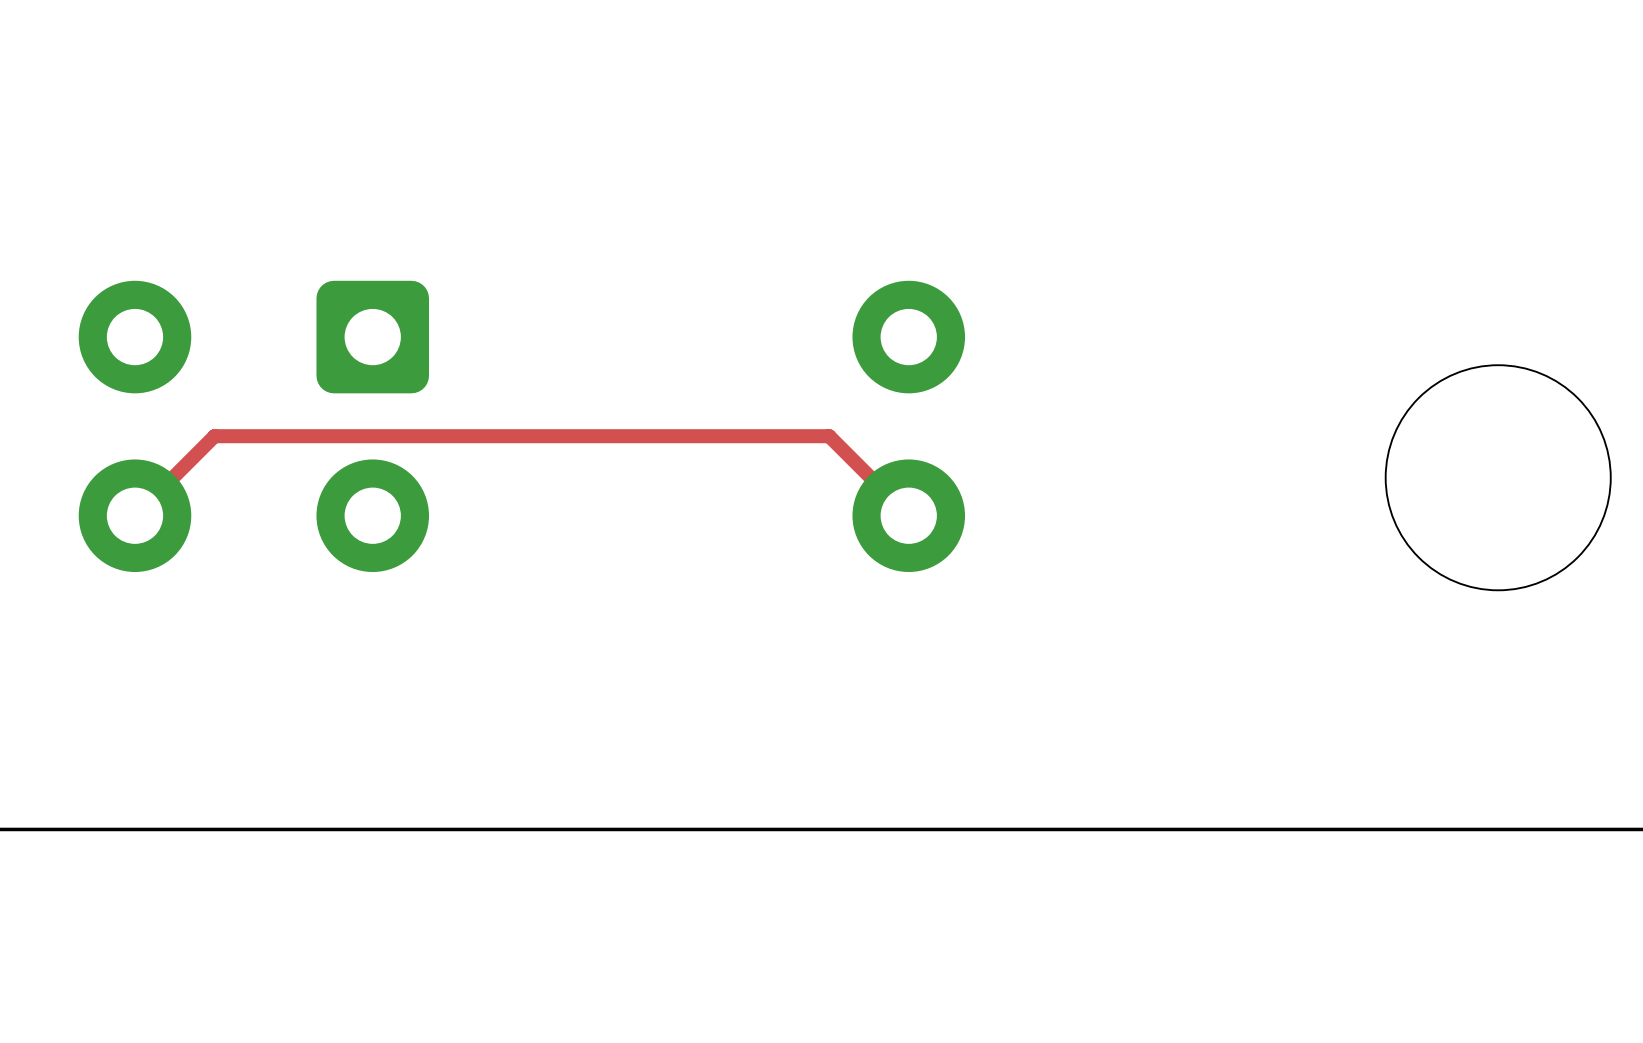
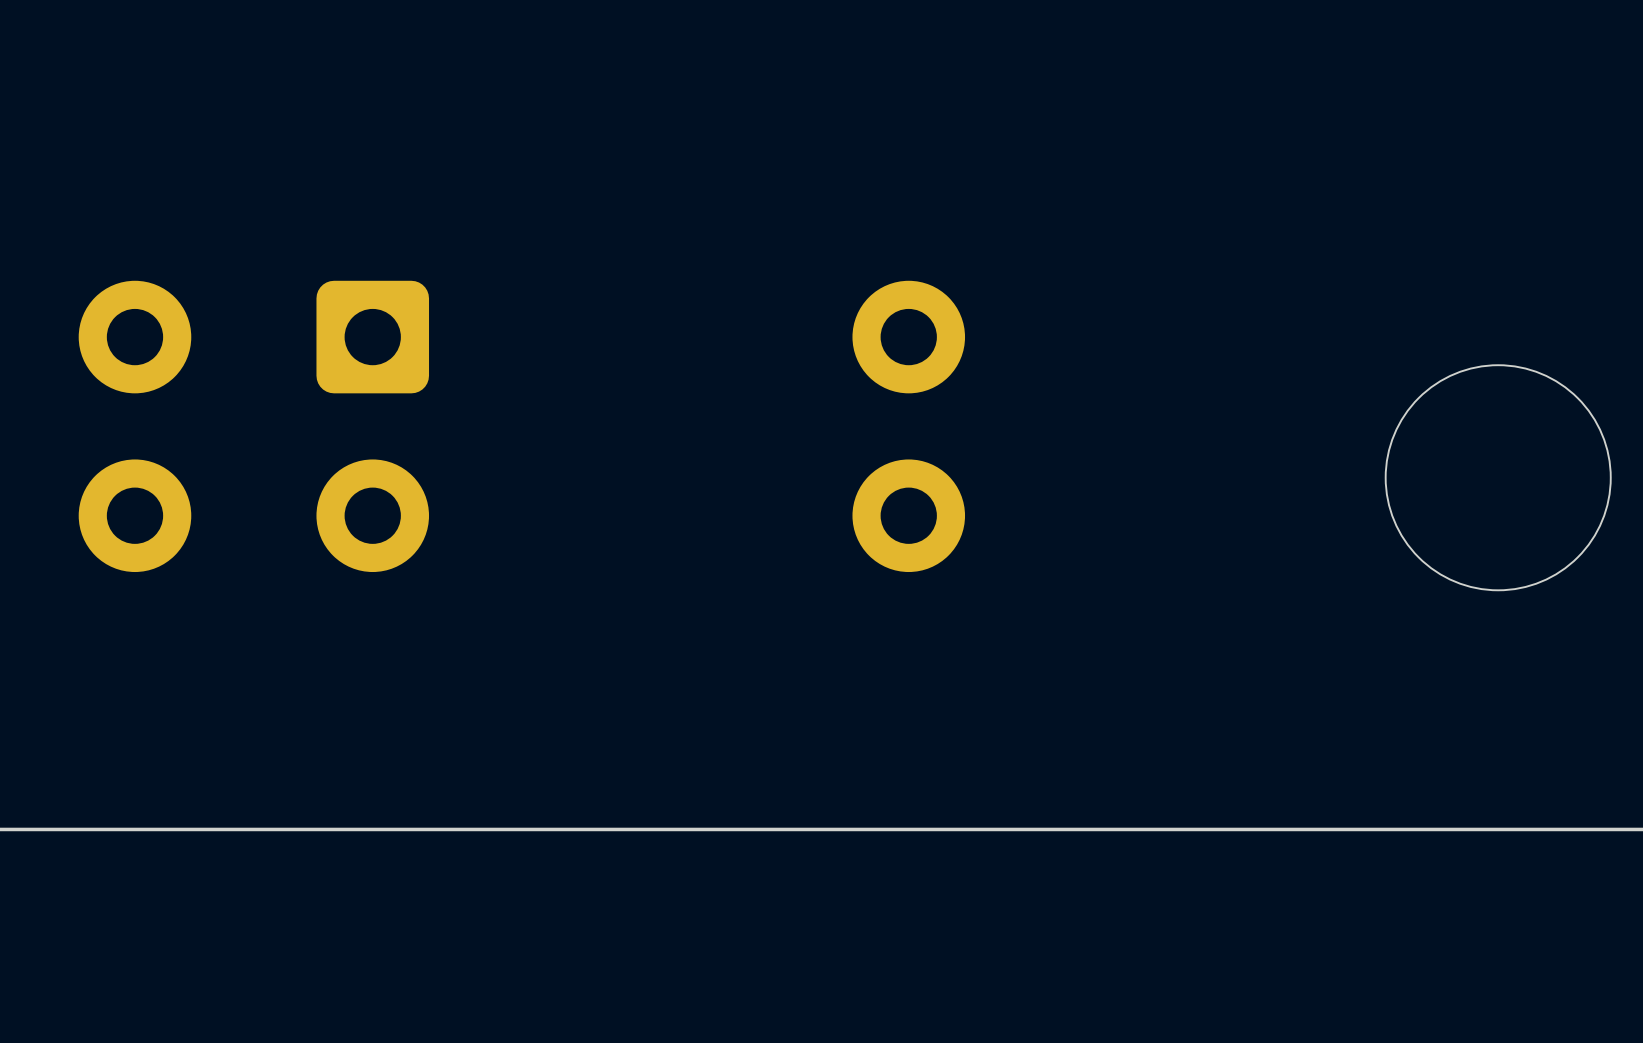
track: (134, 515) (214, 436) (829, 436) (908, 515) -> none

